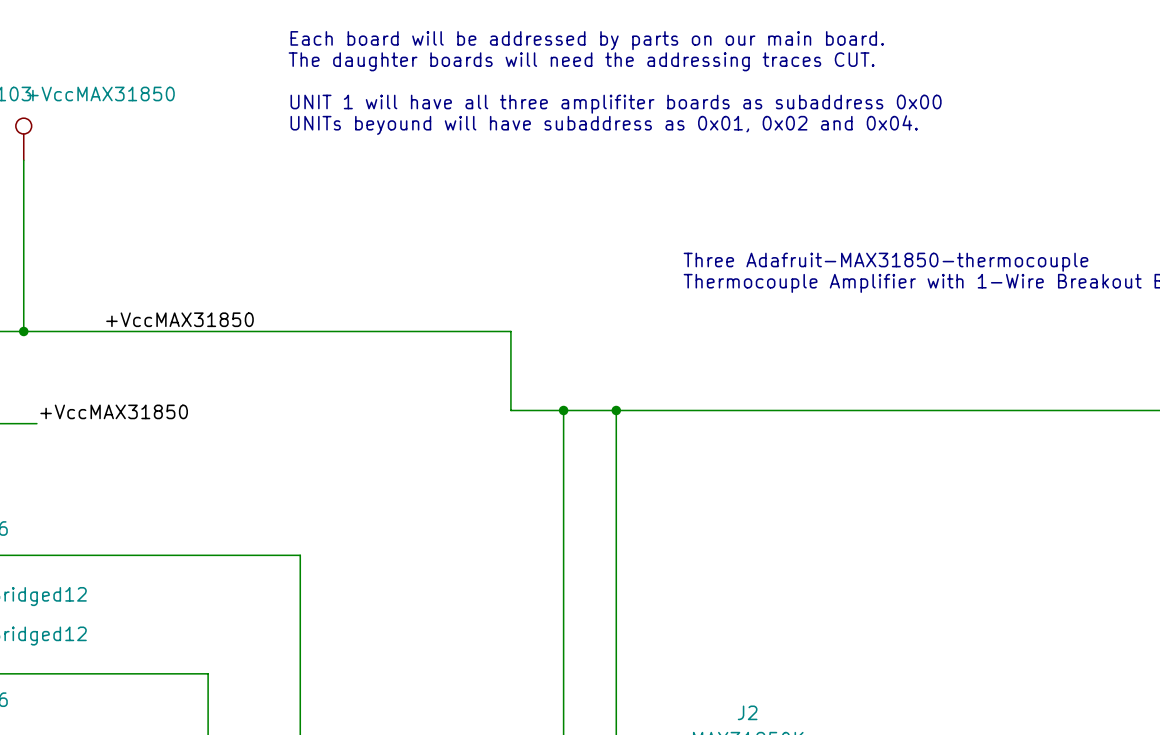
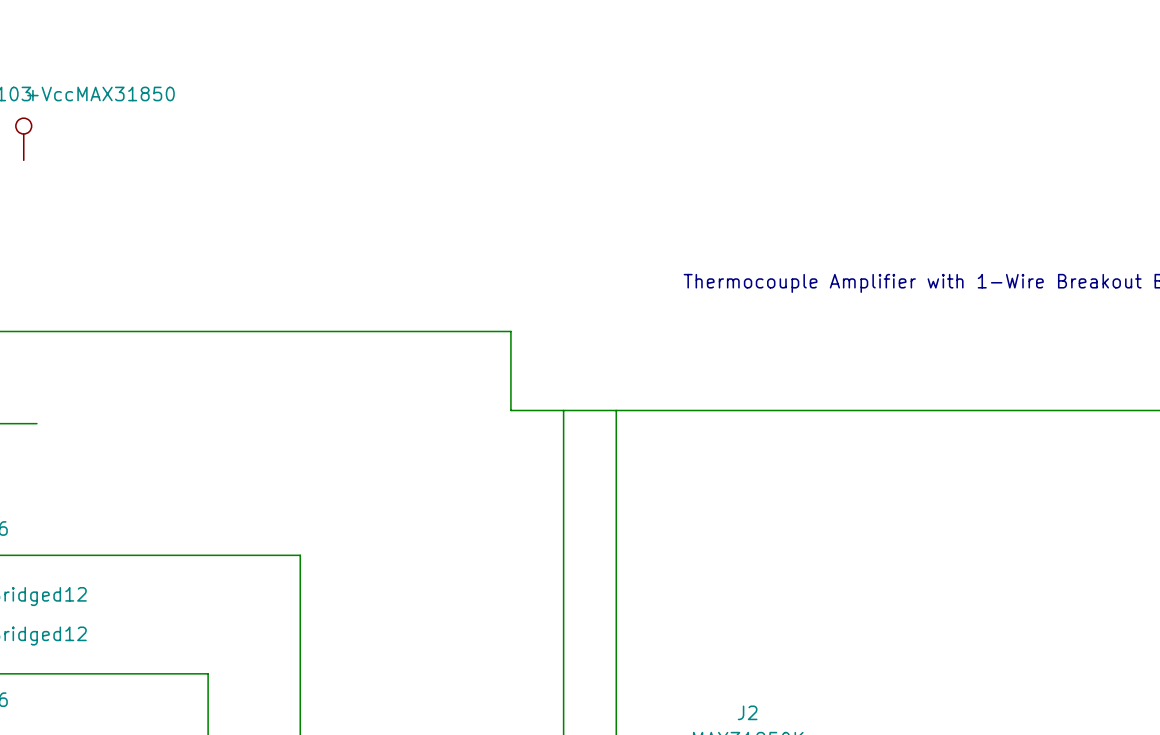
text: Each board will be addressed by parts on our main board. (587, 40) -> none
text: The daughter boards will need the addressing traces CUT. (581, 61) -> none
text: UNIT 1 will have all three amplifiter boards as subaddress 0x00 (616, 104) -> none
text: UNITs beyound will have subaddress as 0x01, 0x02 and 0x04. (604, 125) -> none
wire: (23, 160) (23, 331) -> none
text: Three Adafruit-MAX31850-thermocouple (885, 262) -> none
label: +VccMAX31850 (179, 319) -> none
junction: (23, 331) -> none
junction: (563, 410) -> none
junction: (616, 410) -> none
label: +VccMAX31850 (114, 411) -> none

